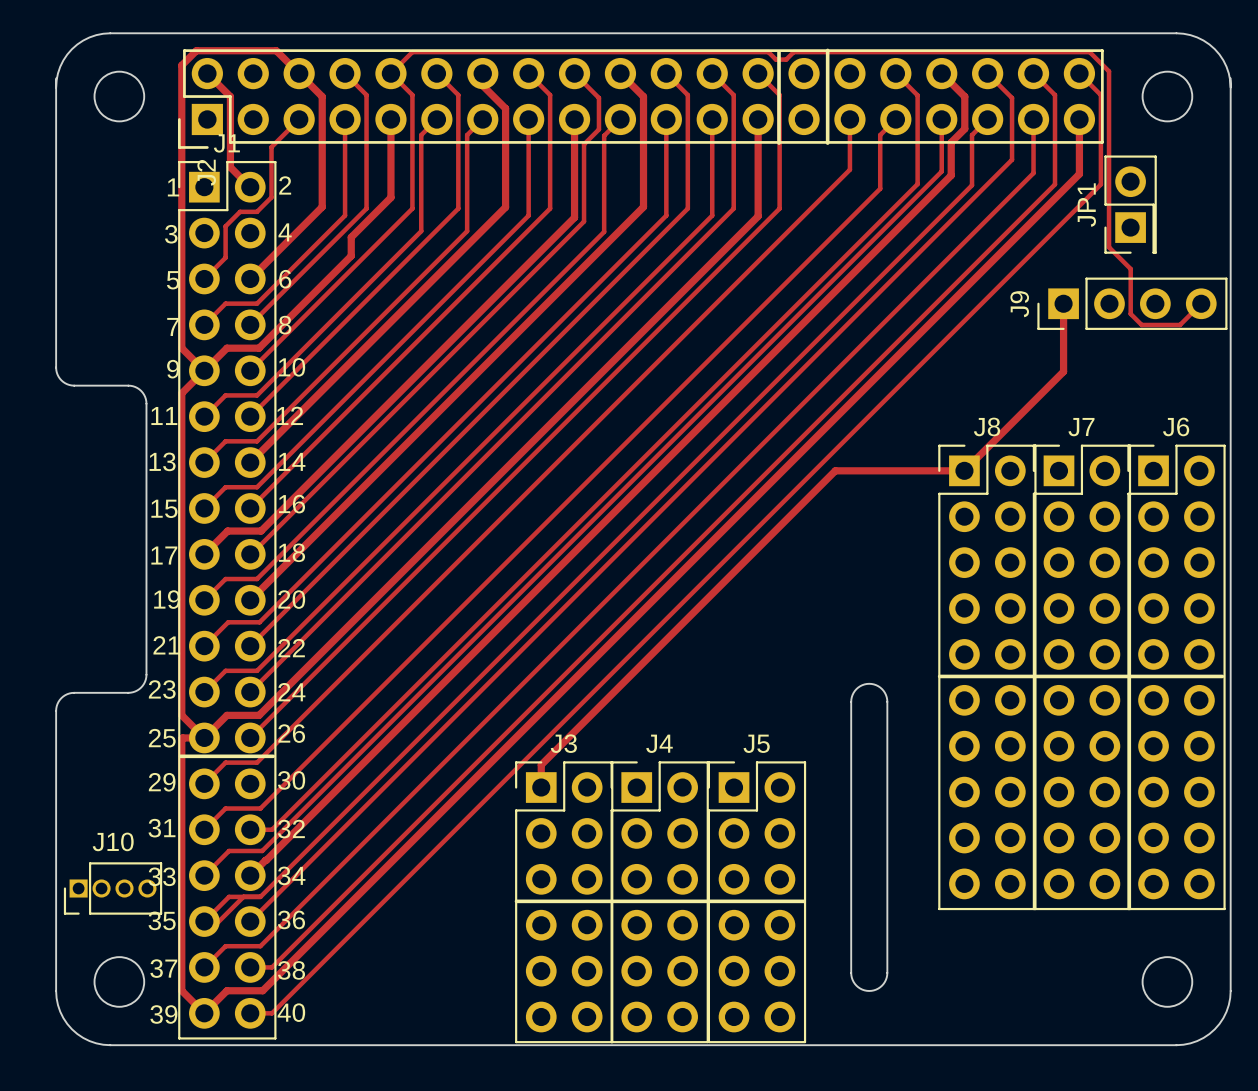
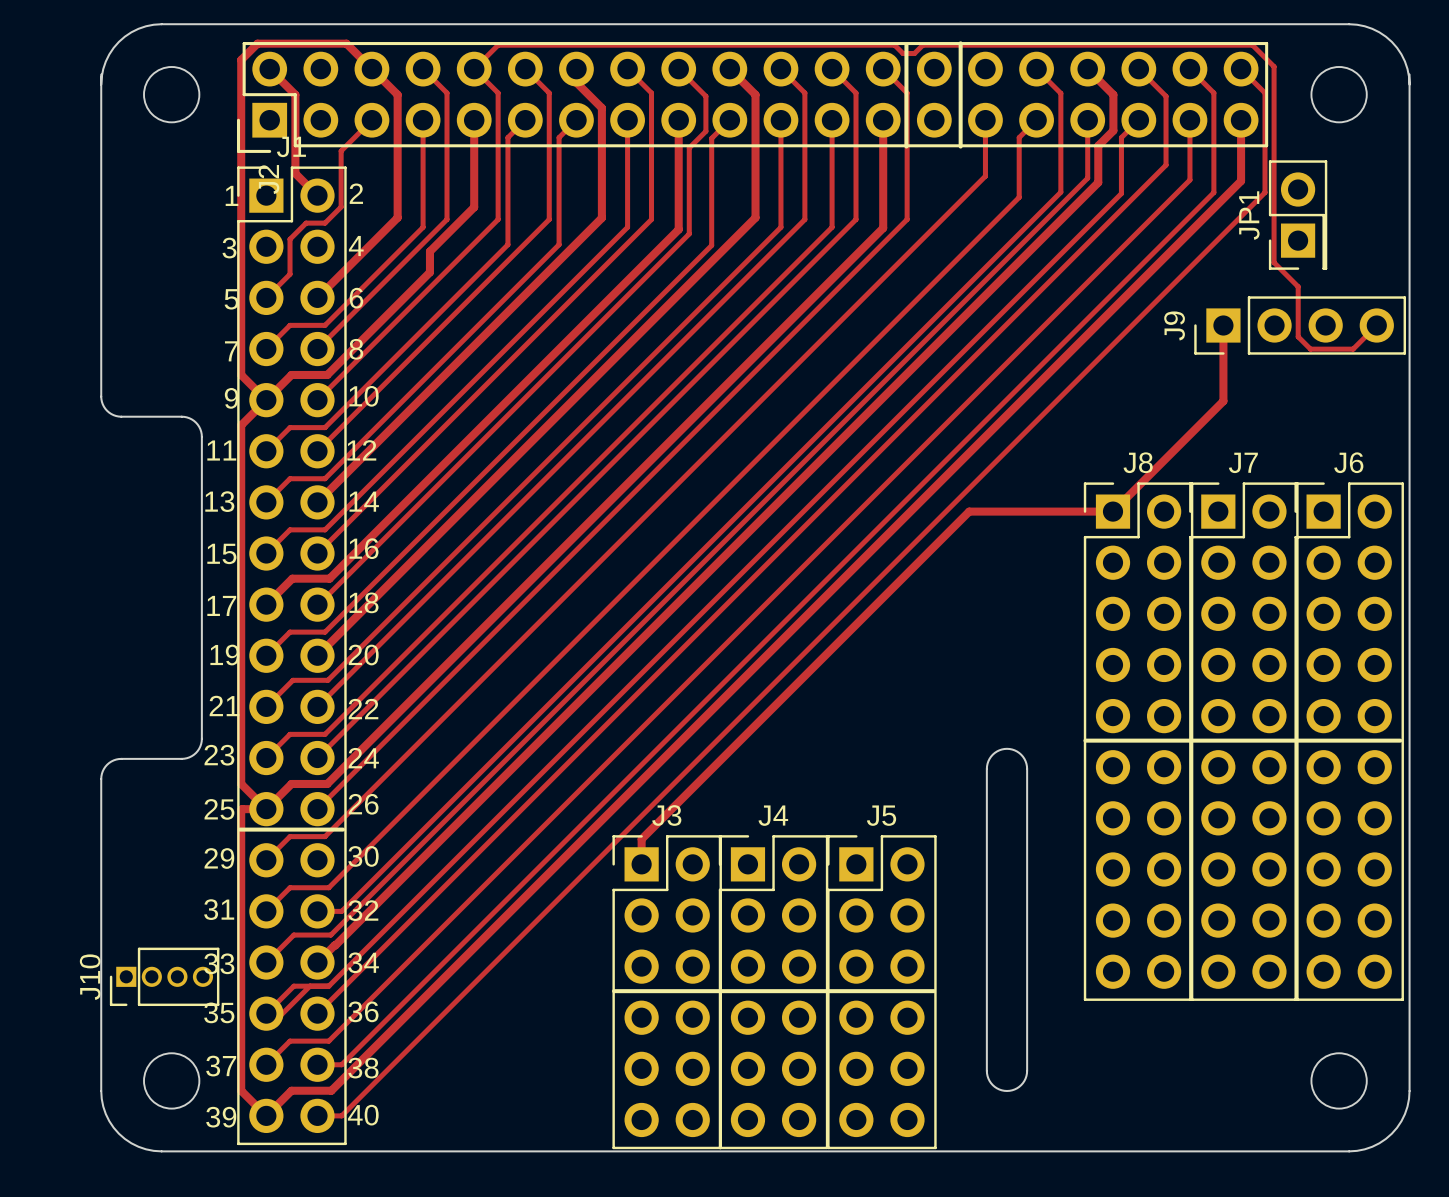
J10 name rotation: 0° (113, 841) -> 90° counterclockwise (90, 977)
J10 name position: J10 (113, 841) -> J10 (90, 977)

